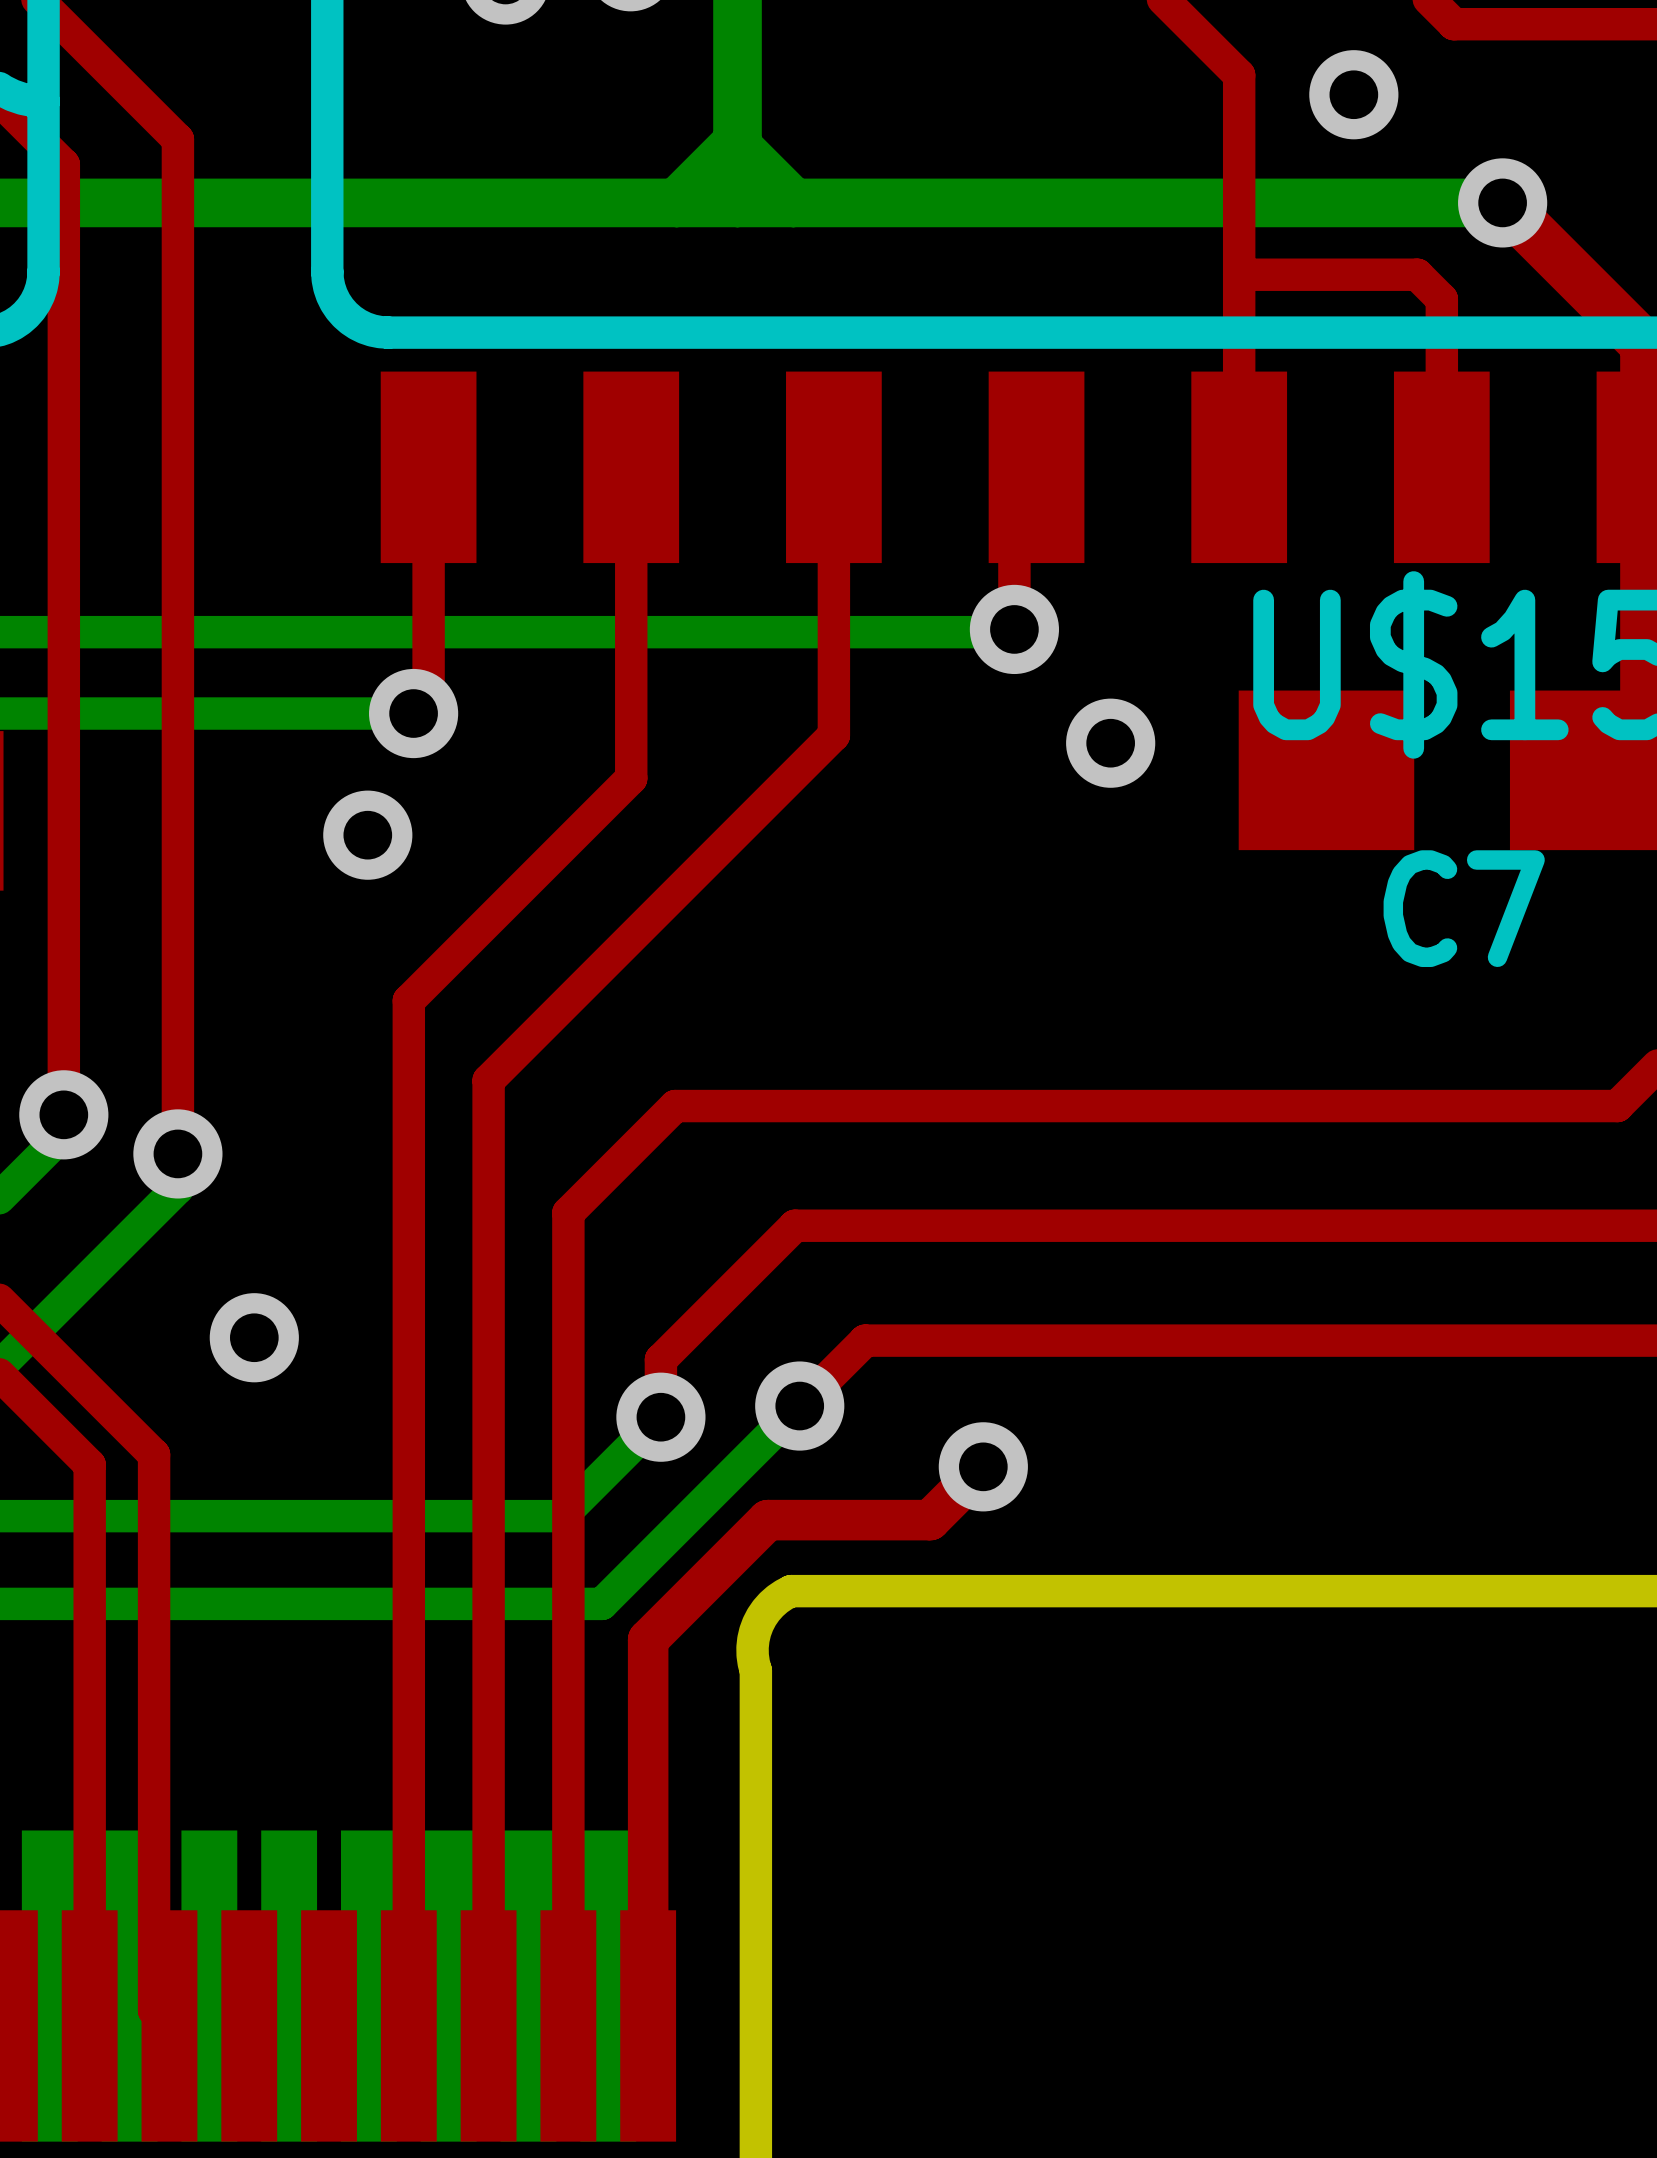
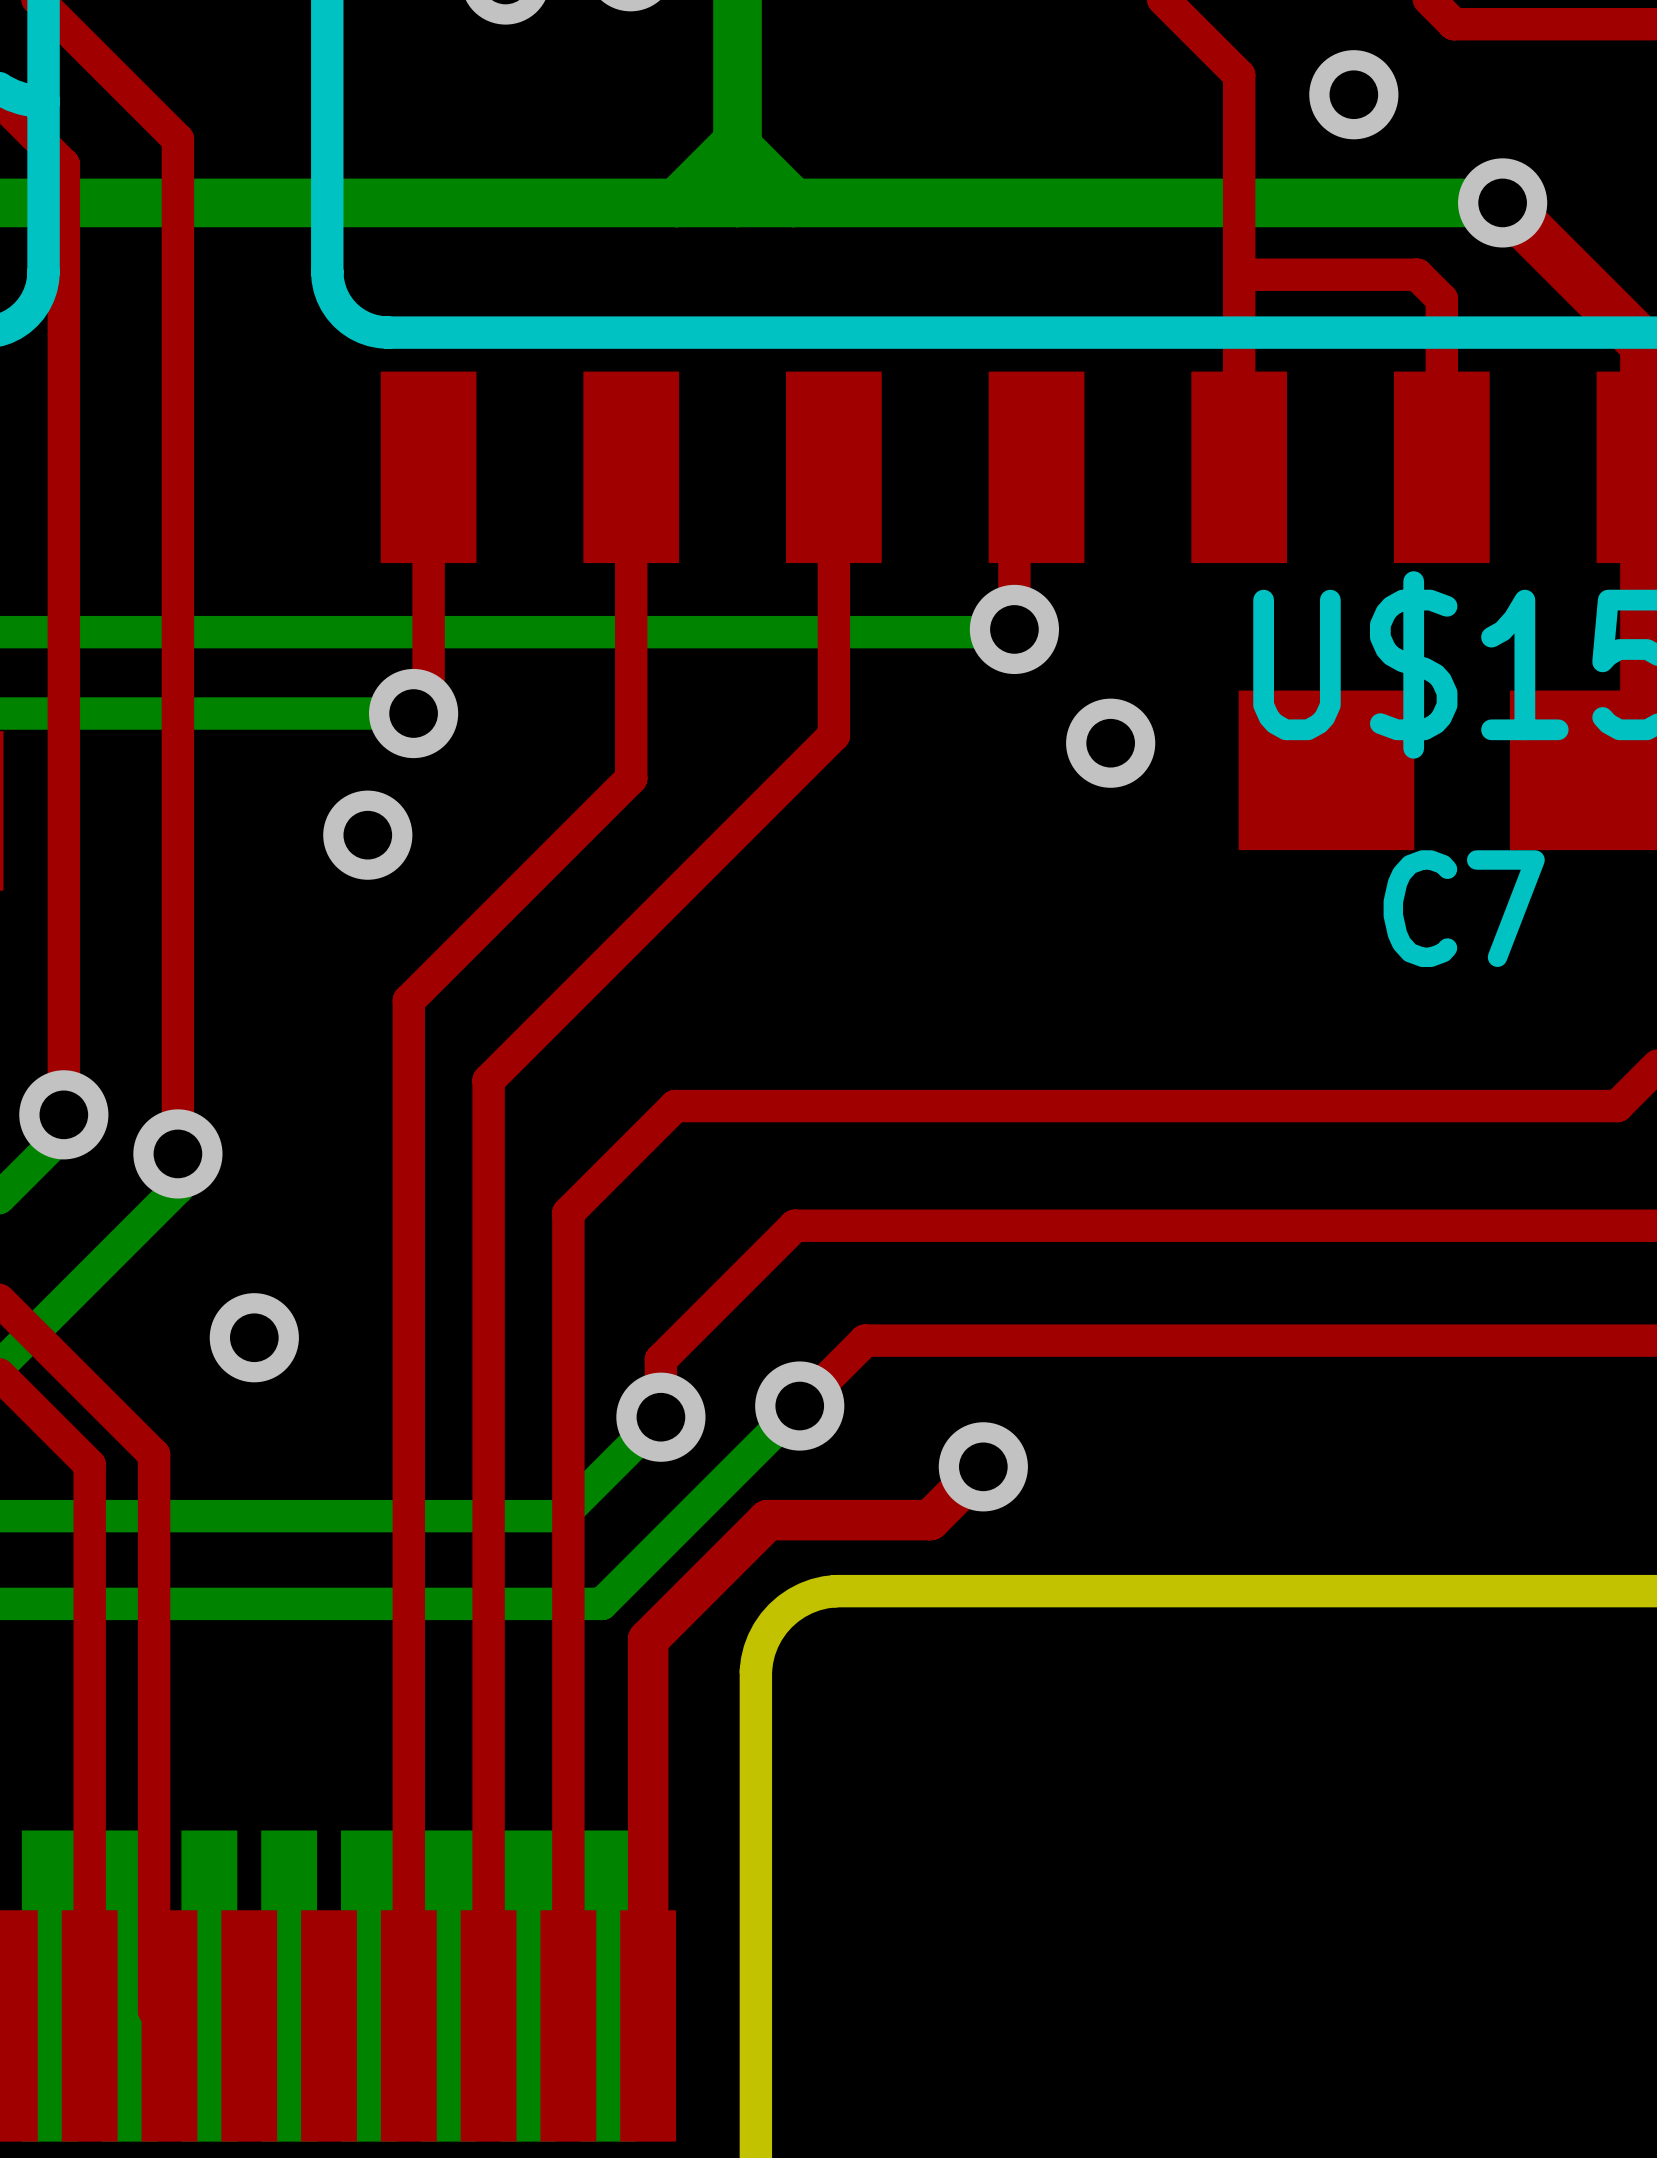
board edge: (835, 1591) (791, 1591) (771, 1604) (761, 1617) (755, 1631) (752, 1655) (755, 1670) -> (835, 1591) (805, 1598) (780, 1615) (763, 1641) (755, 1670)

